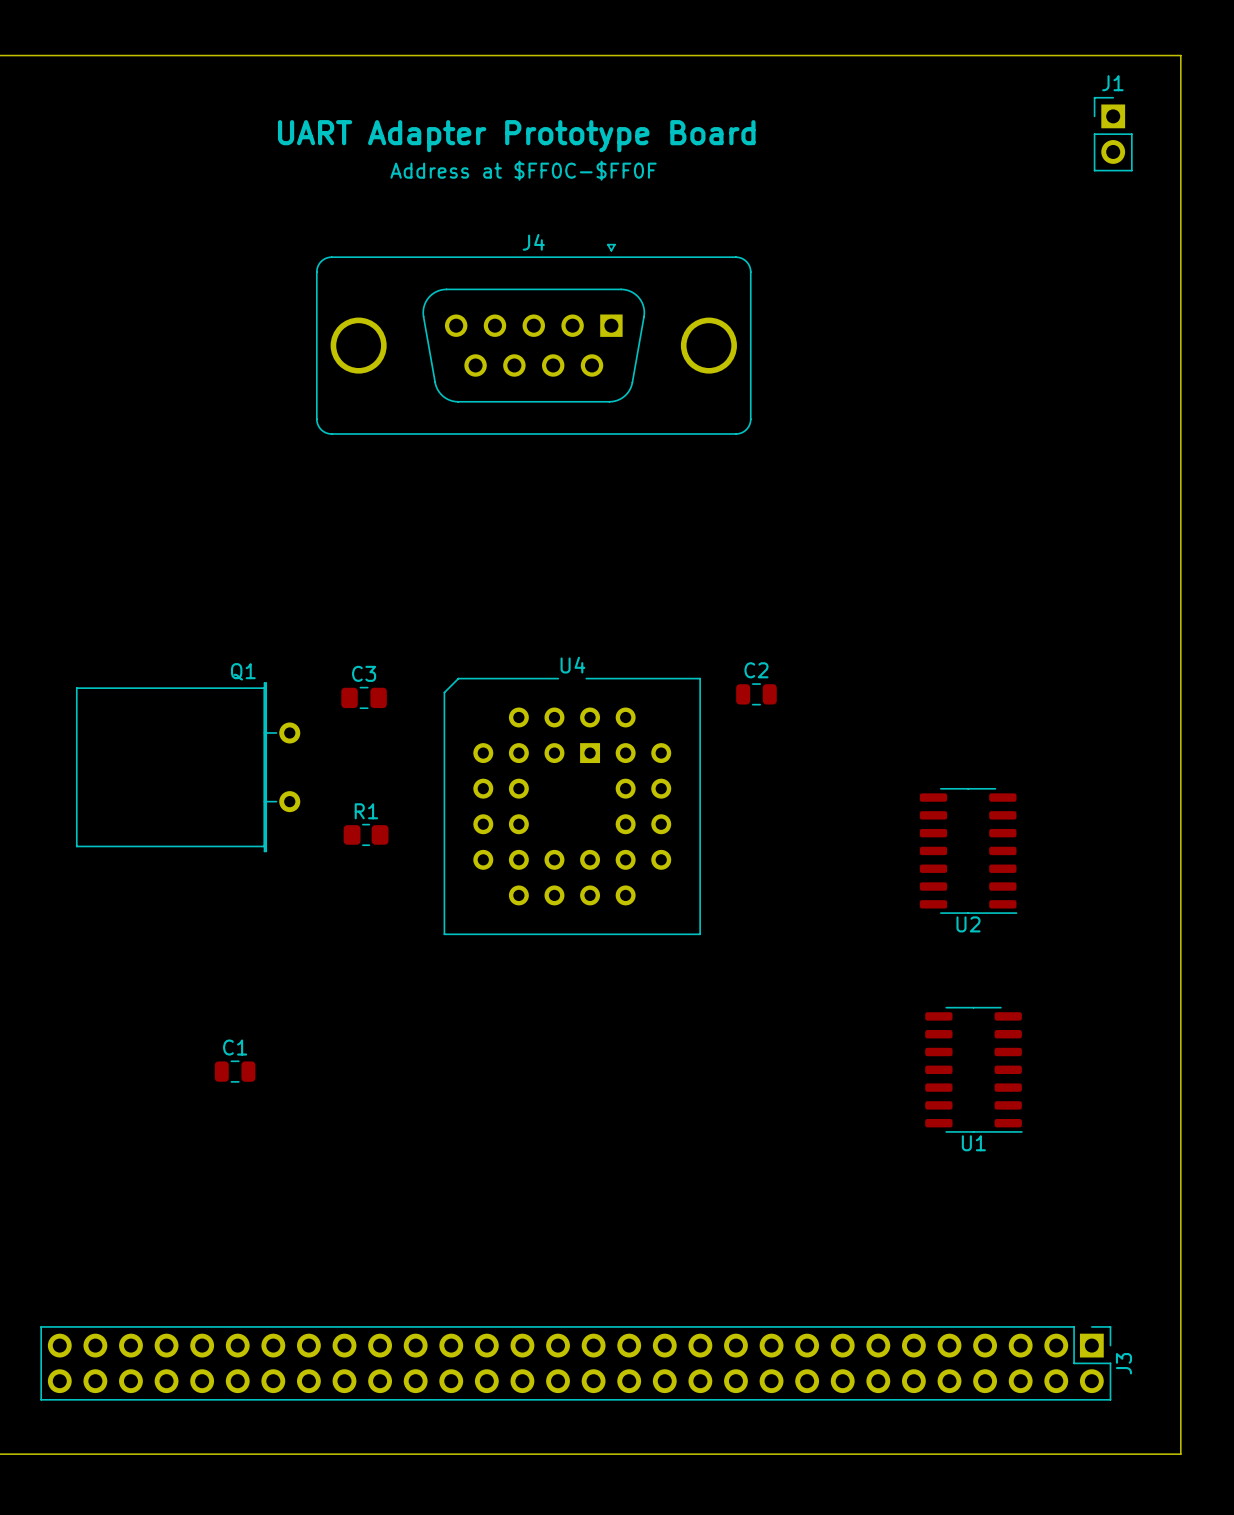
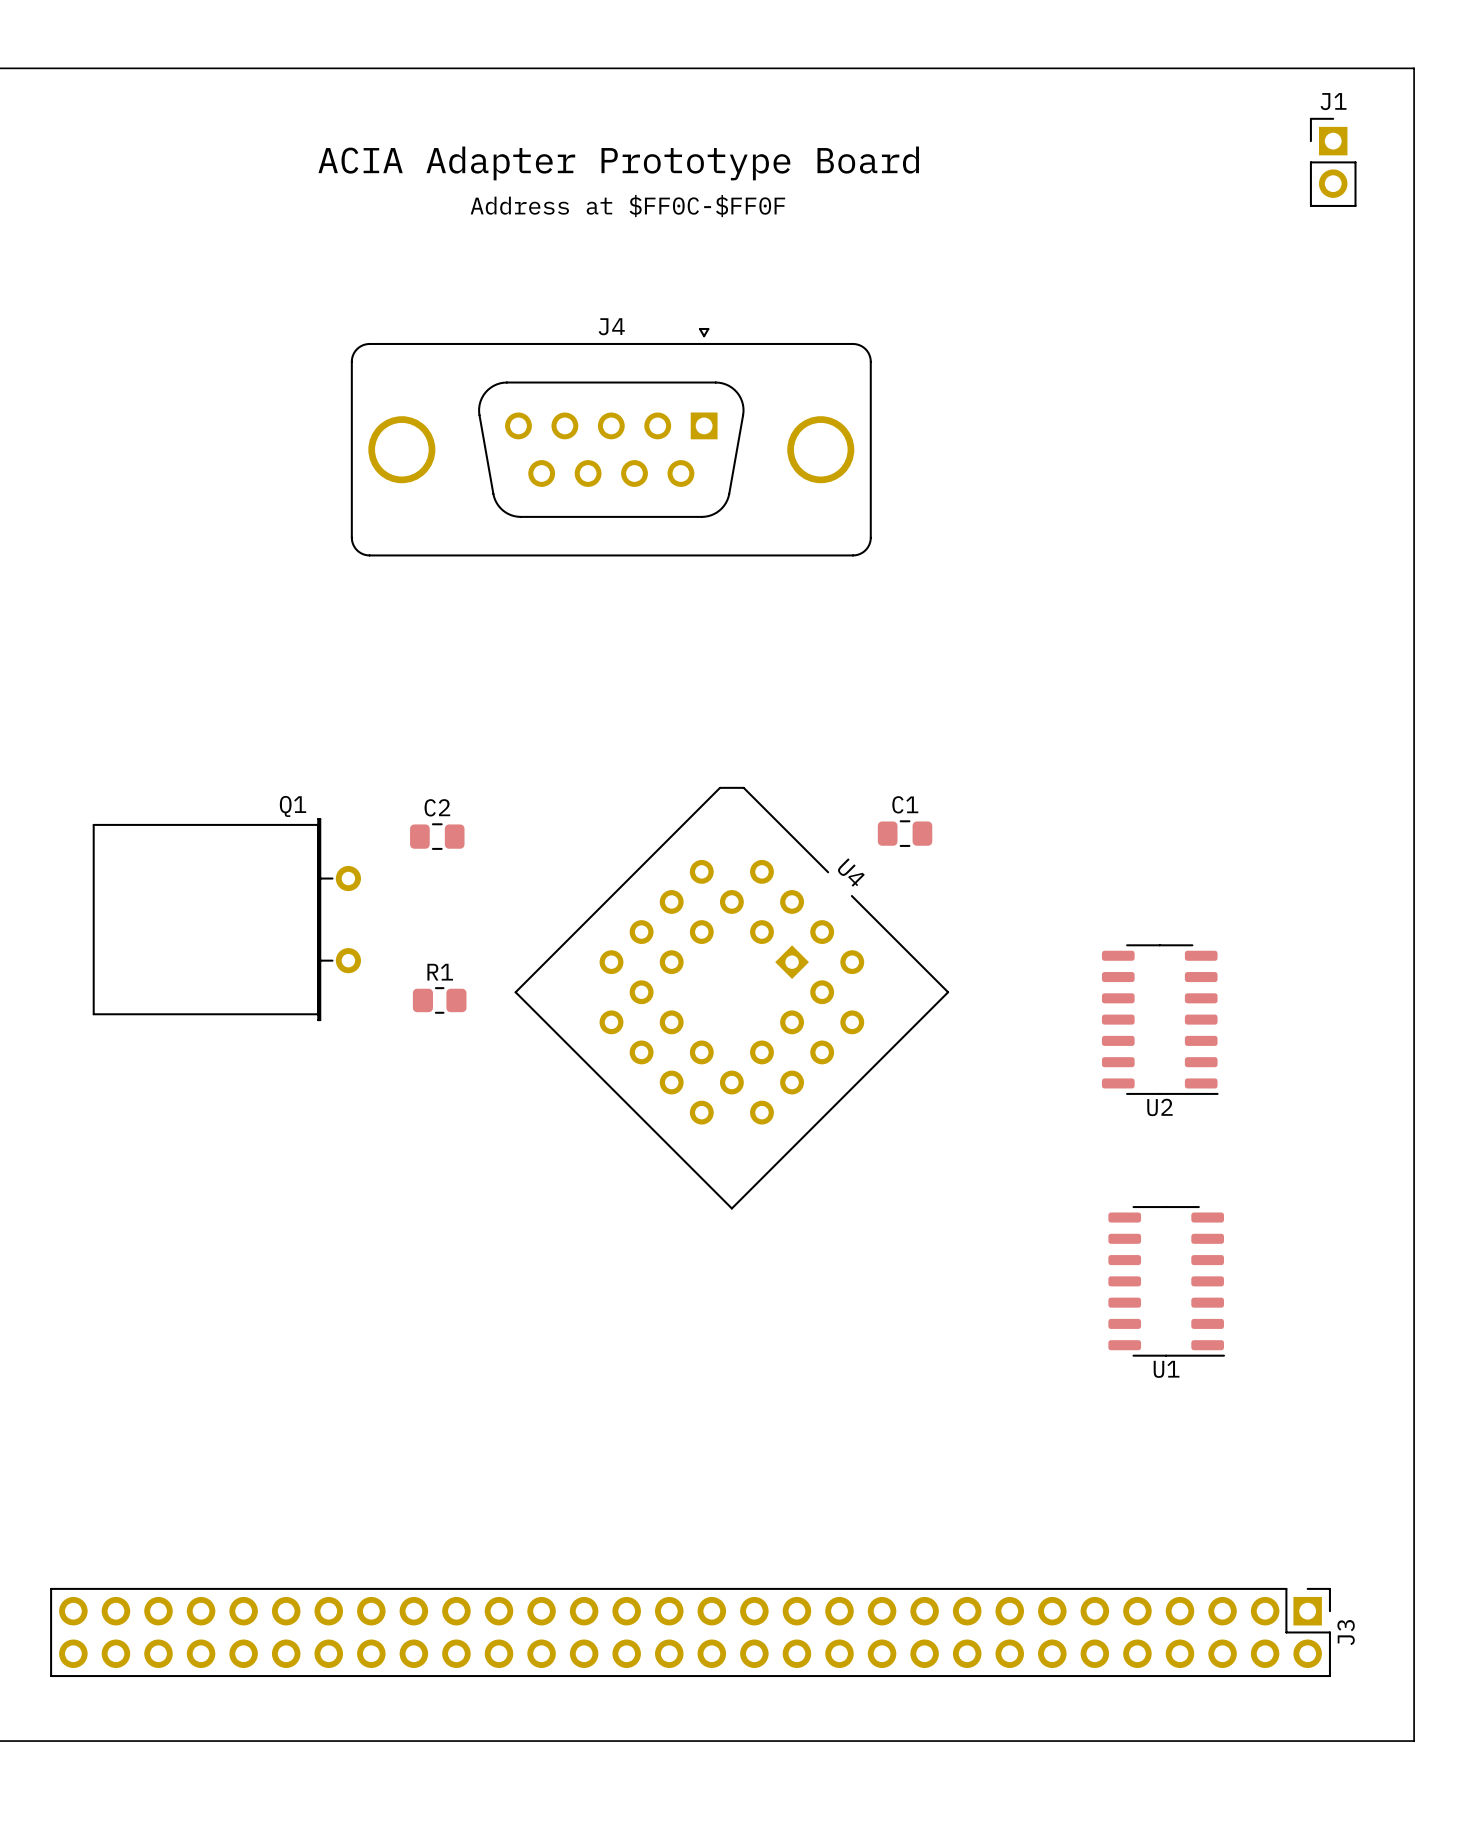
text: UART Adapter Prototype Board (516, 136) -> ACIA Adapter Prototype Board (618, 163)
J4 position: (533, 339) -> (611, 442)
C3 name: C3 (364, 673) -> C2 (437, 807)
C2: (756, 694) -> none
U4 rotation: 0° (572, 806) -> 45° clockwise (731, 998)
C1 footprint: [214, 1060, 256, 1083] -> [877, 820, 933, 847]

